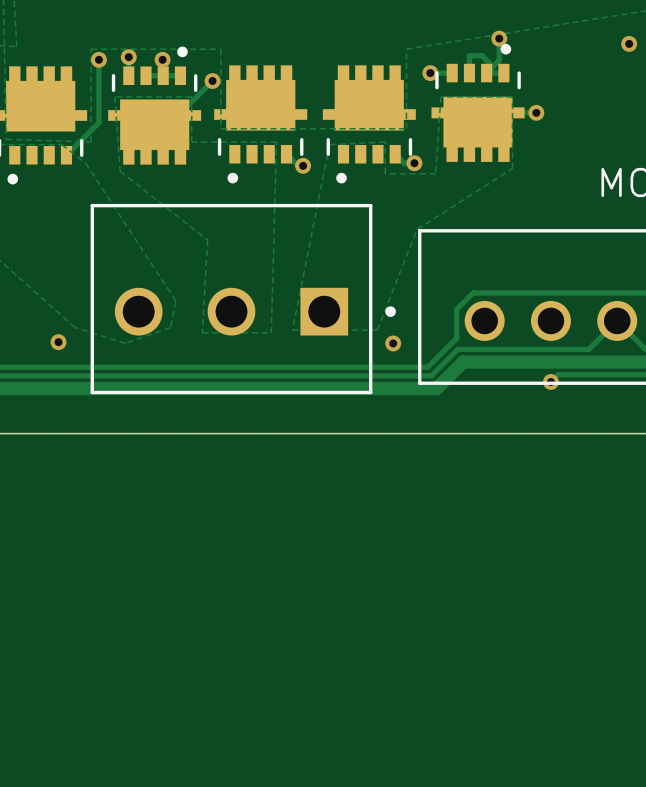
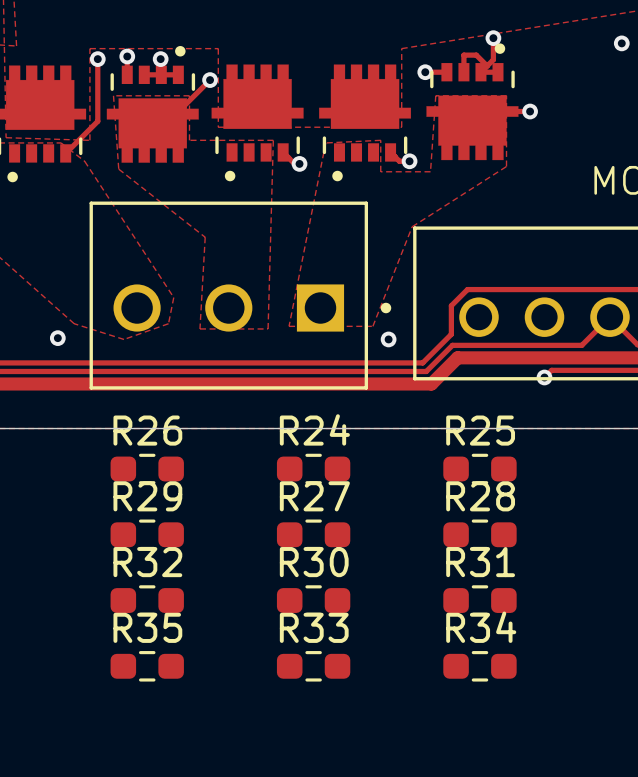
R26: none -> (147, 469)
R24: none -> (313, 469)
R25: none -> (479, 469)
R29: none -> (147, 534)
R27: none -> (313, 534)
R28: none -> (479, 534)
R32: none -> (147, 600)
R30: none -> (313, 600)
R31: none -> (479, 600)
R35: none -> (147, 666)
R33: none -> (313, 666)
R34: none -> (479, 666)

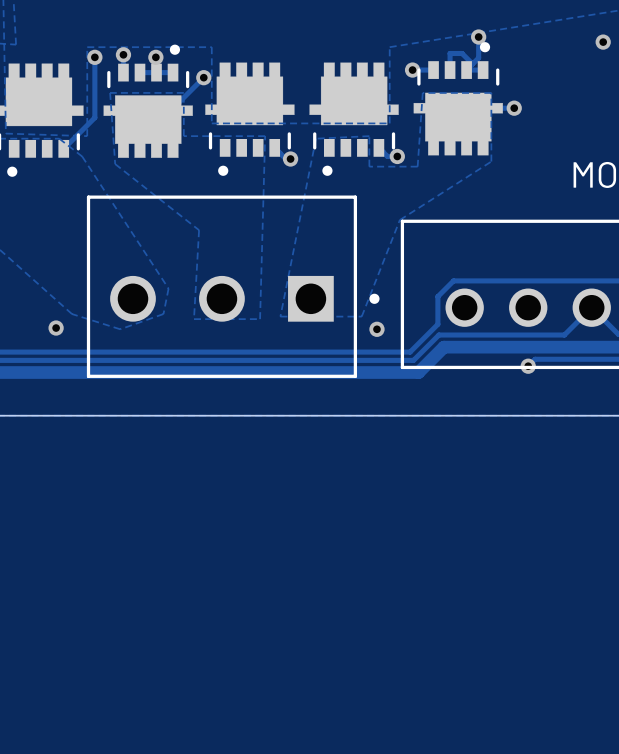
R26: (147, 469) -> none
R24: (313, 469) -> none
R25: (479, 469) -> none
R29: (147, 534) -> none
R27: (313, 534) -> none
R28: (479, 534) -> none
R32: (147, 600) -> none
R30: (313, 600) -> none
R31: (479, 600) -> none
R35: (147, 666) -> none
R33: (313, 666) -> none
R34: (479, 666) -> none

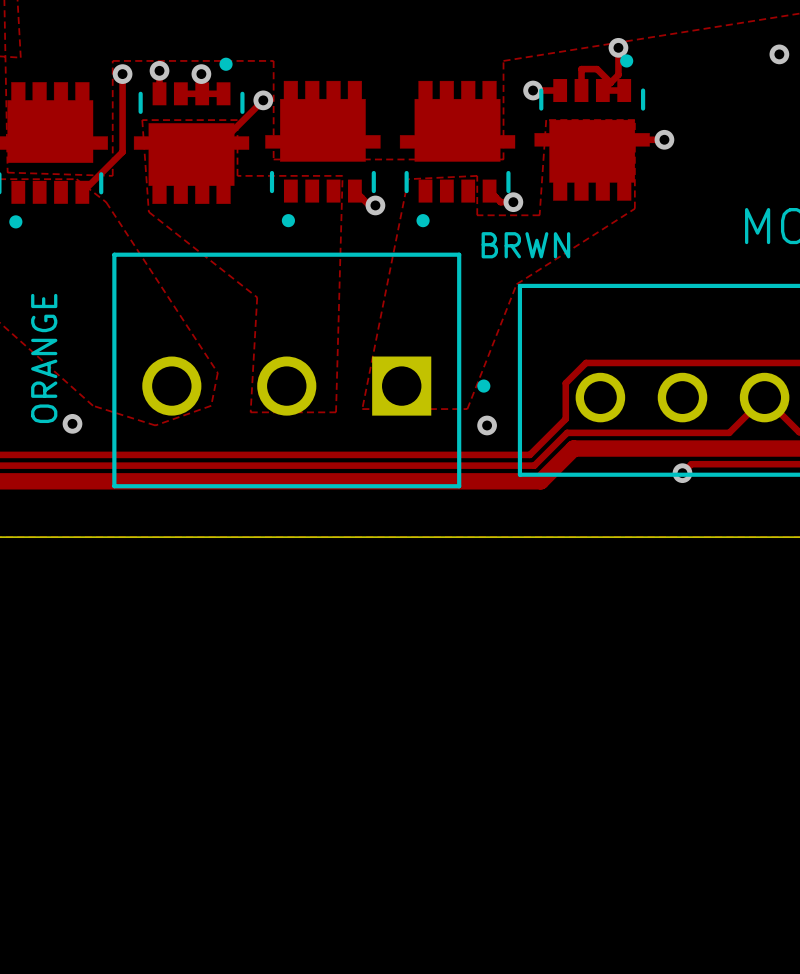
text: none -> BRWN (525, 245)
text: none -> ORANGE (44, 358)

